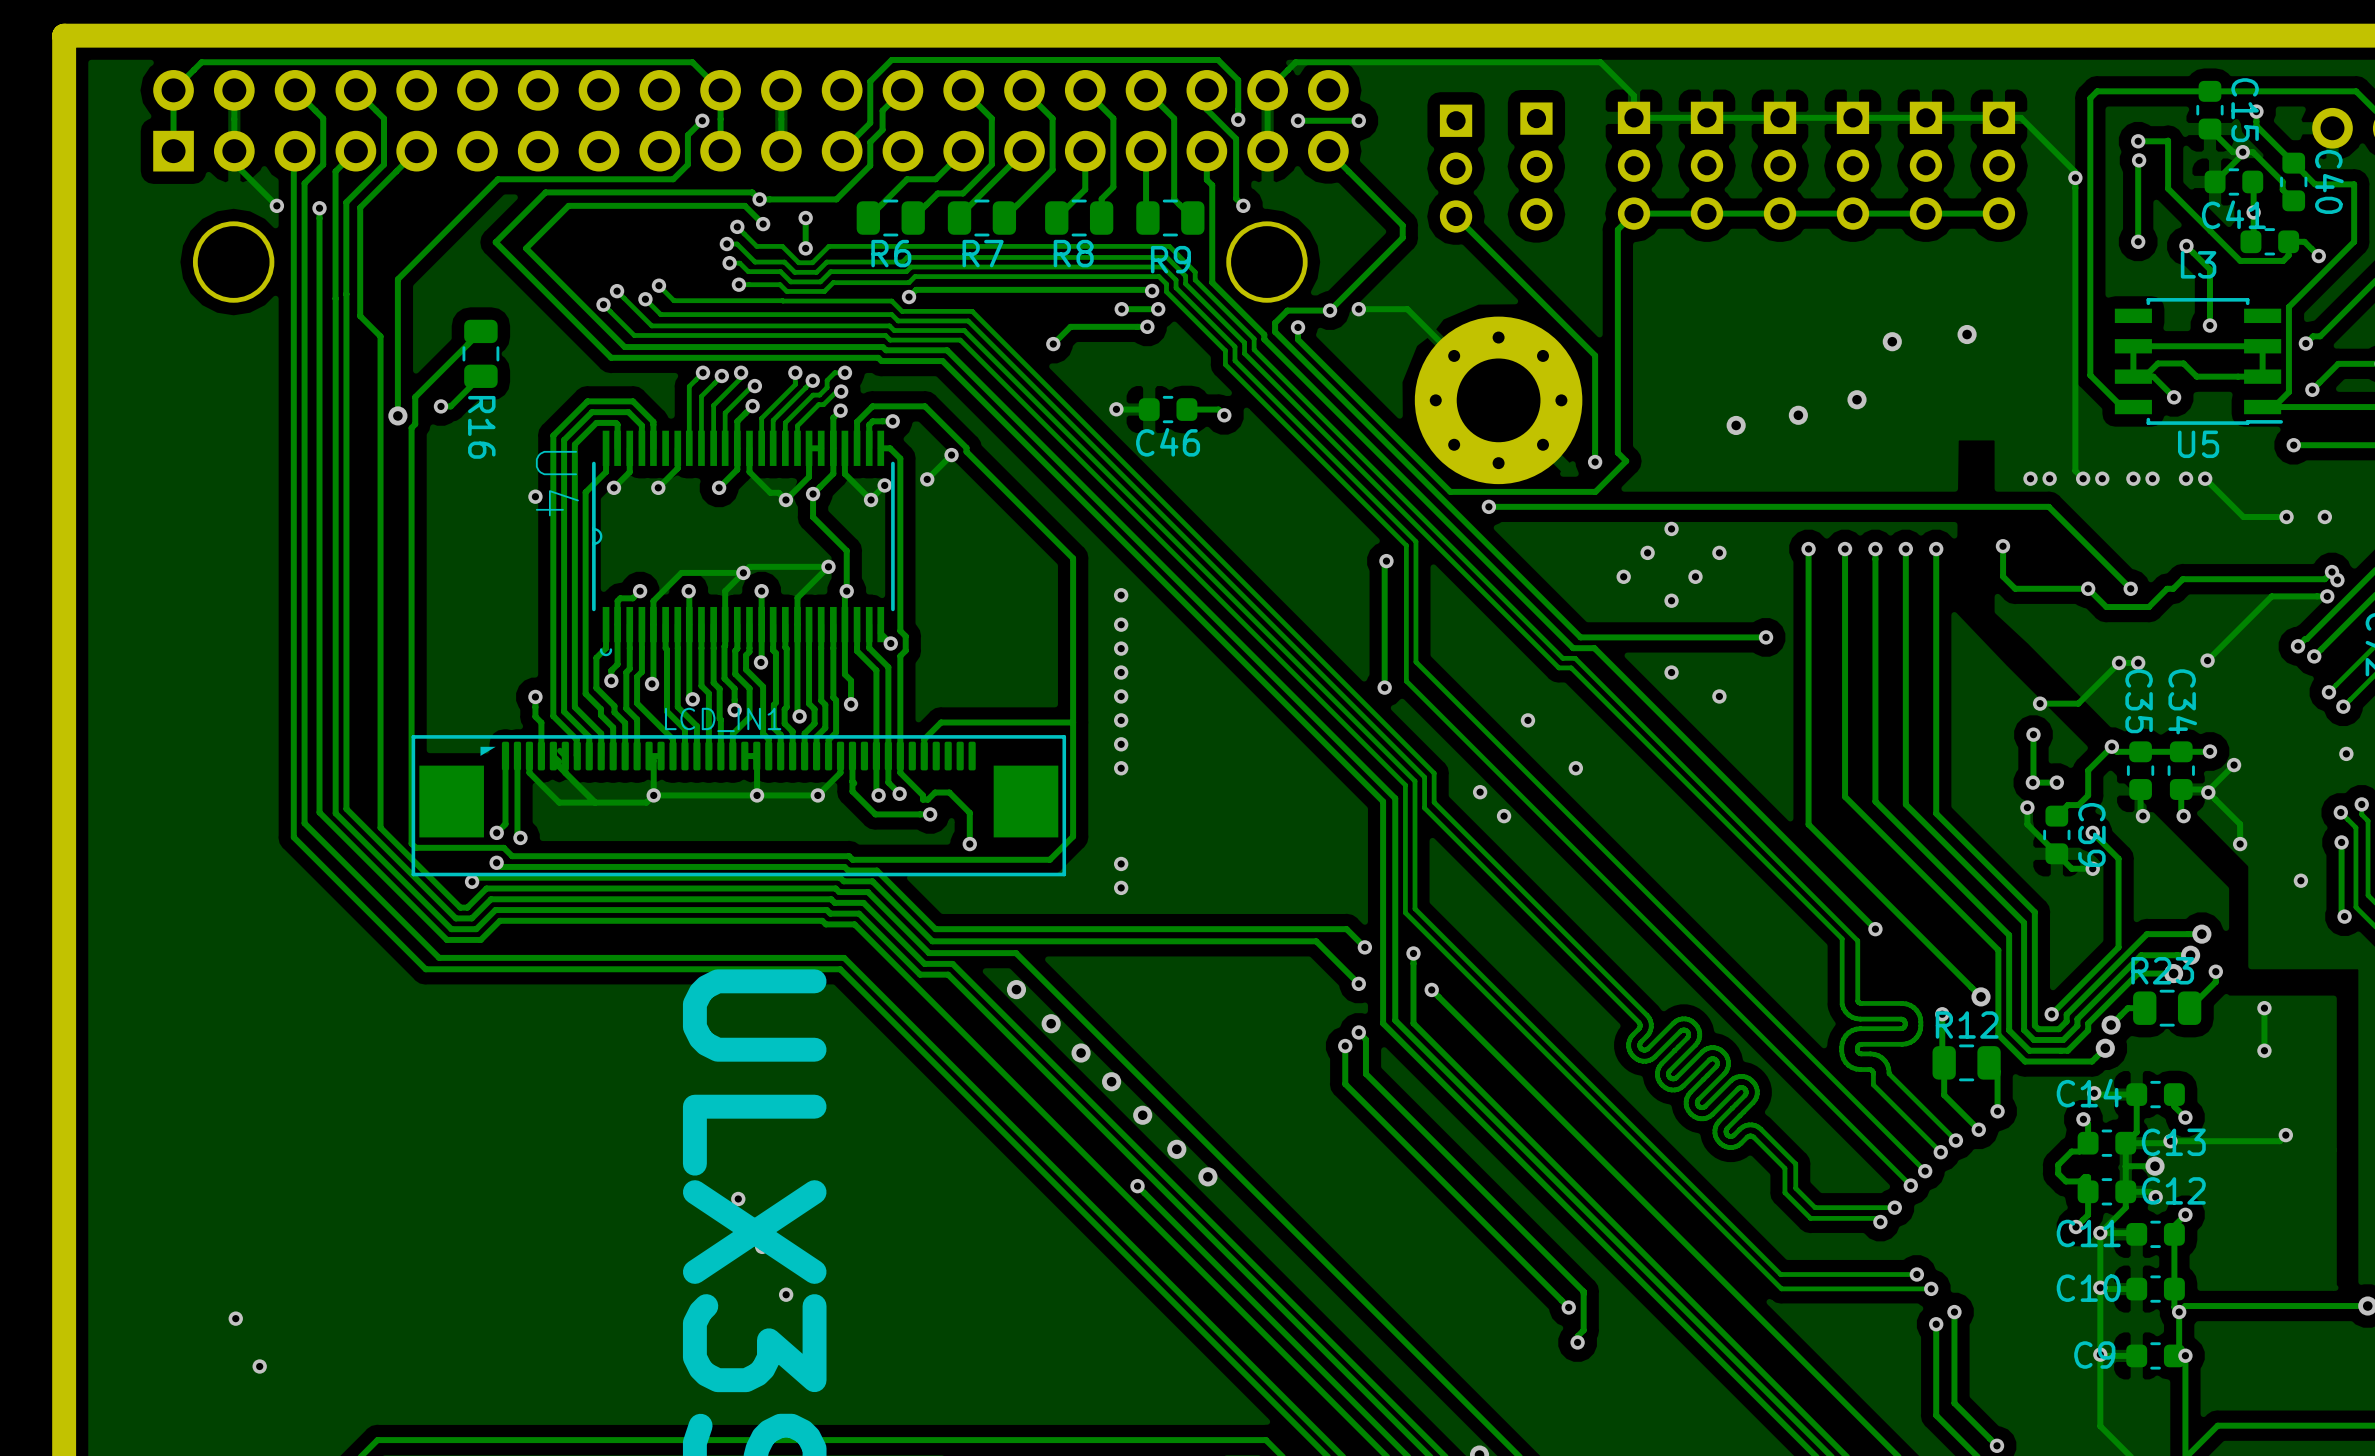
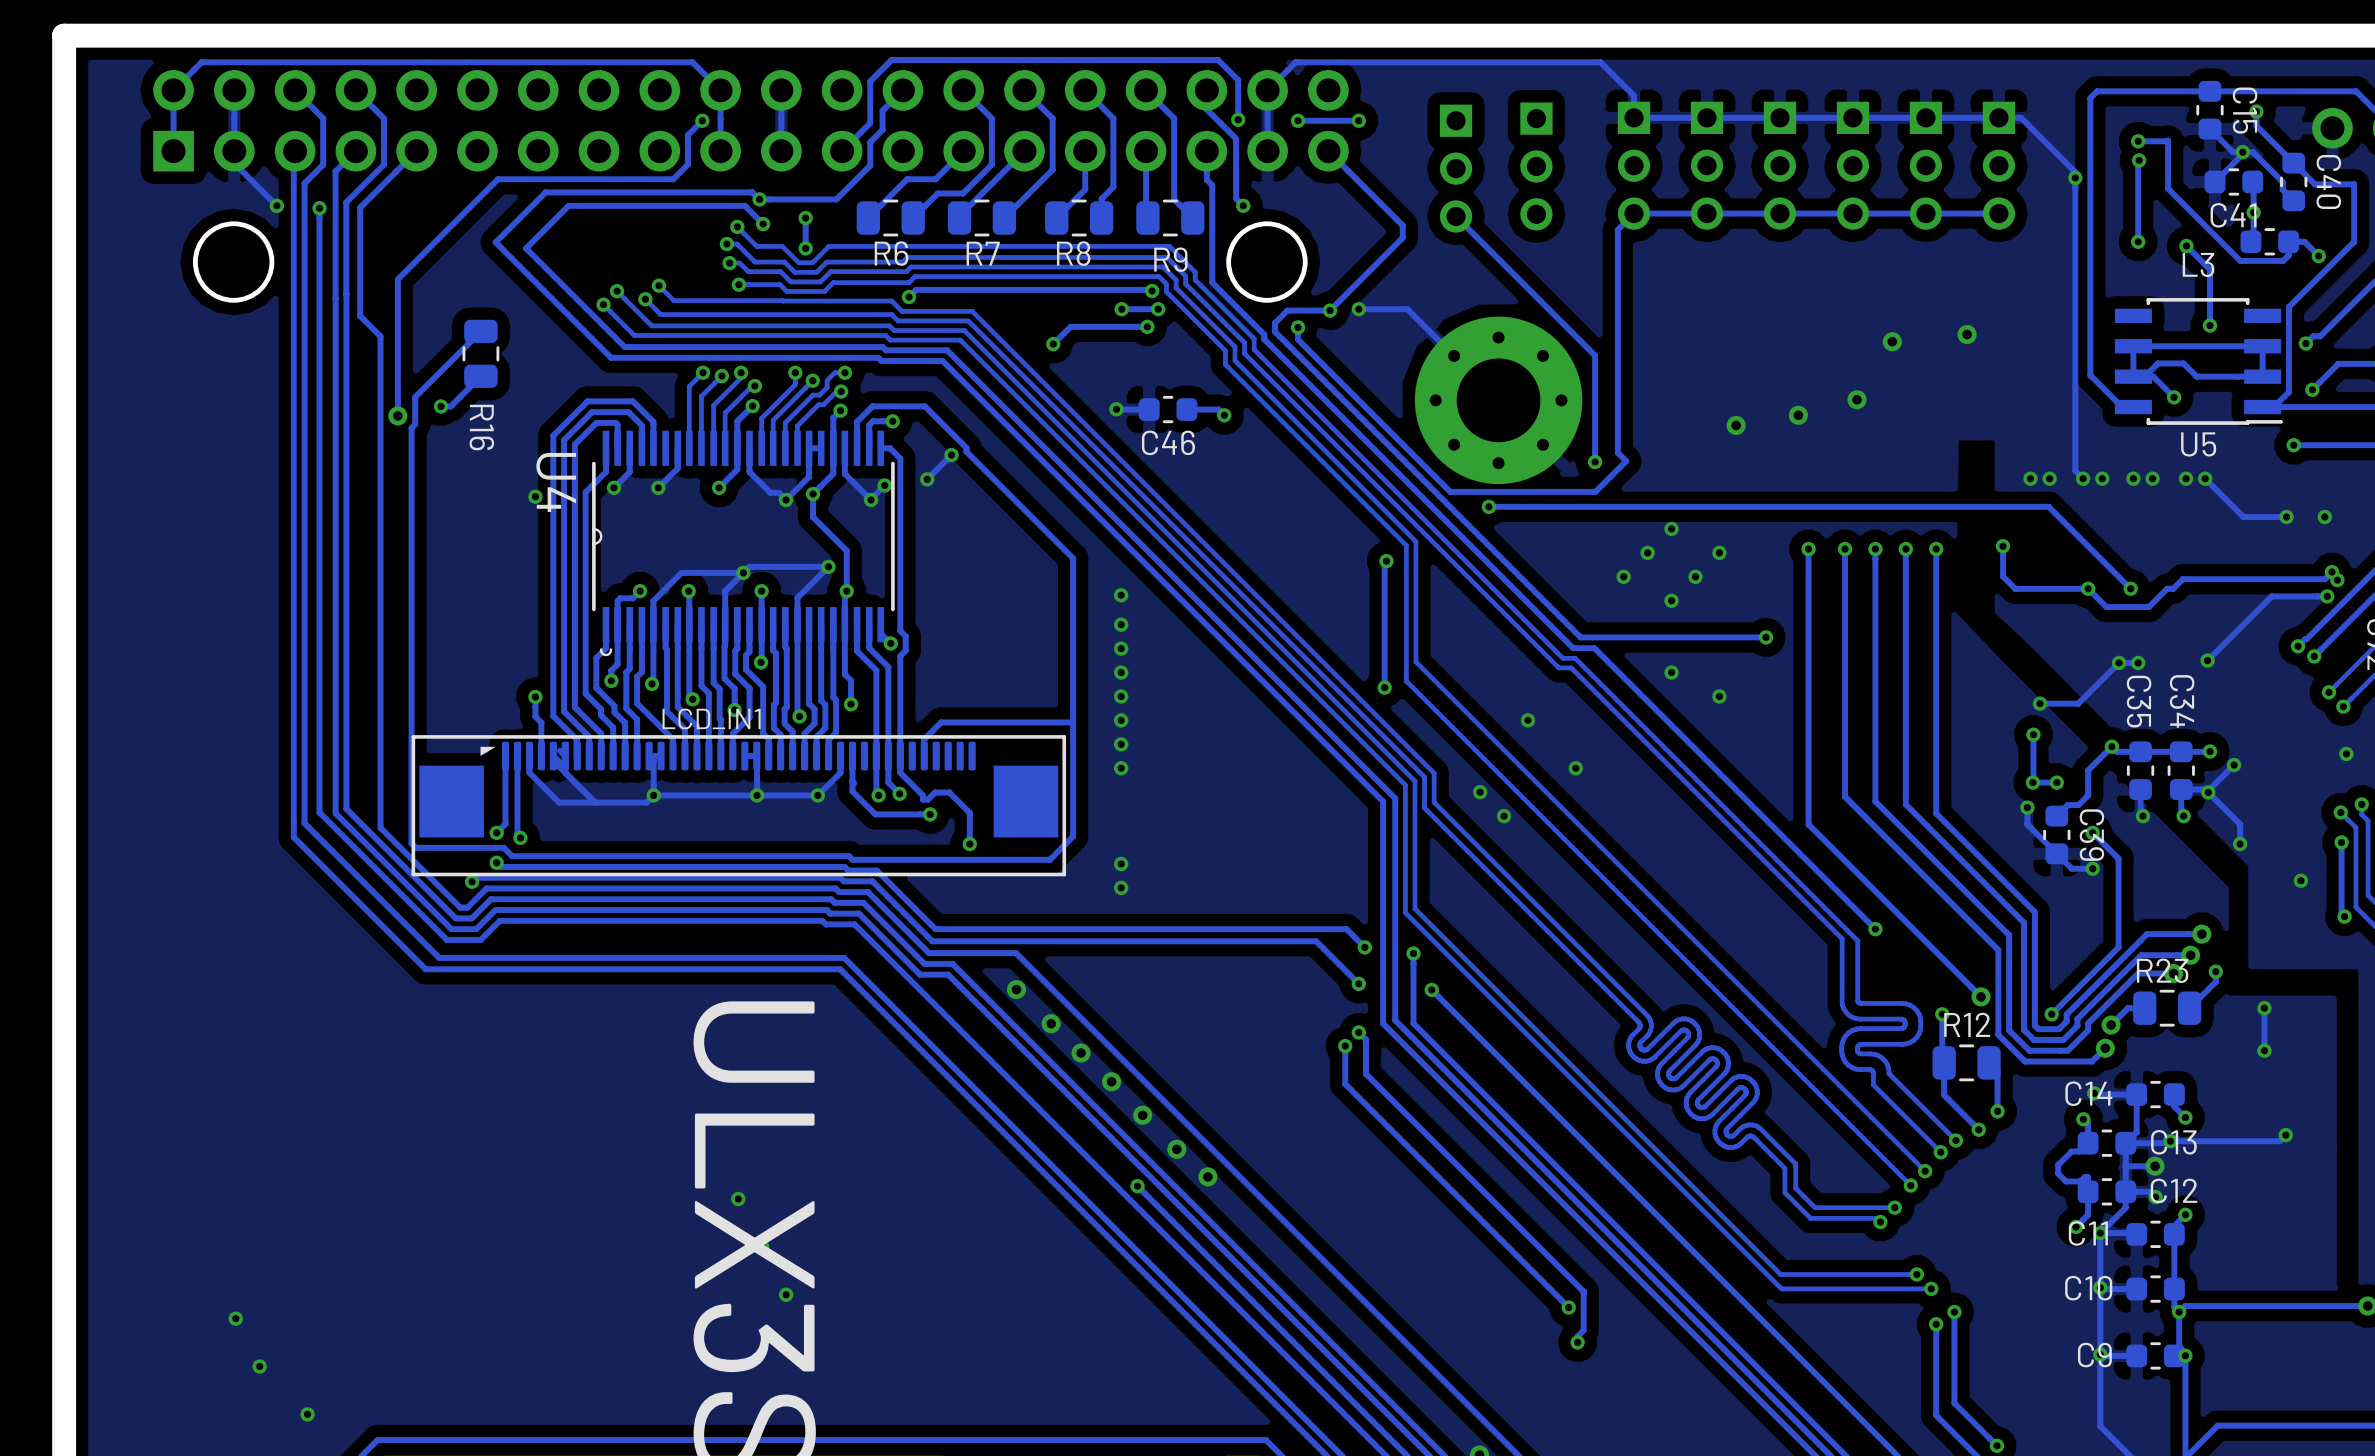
via: none -> (307, 1414)

